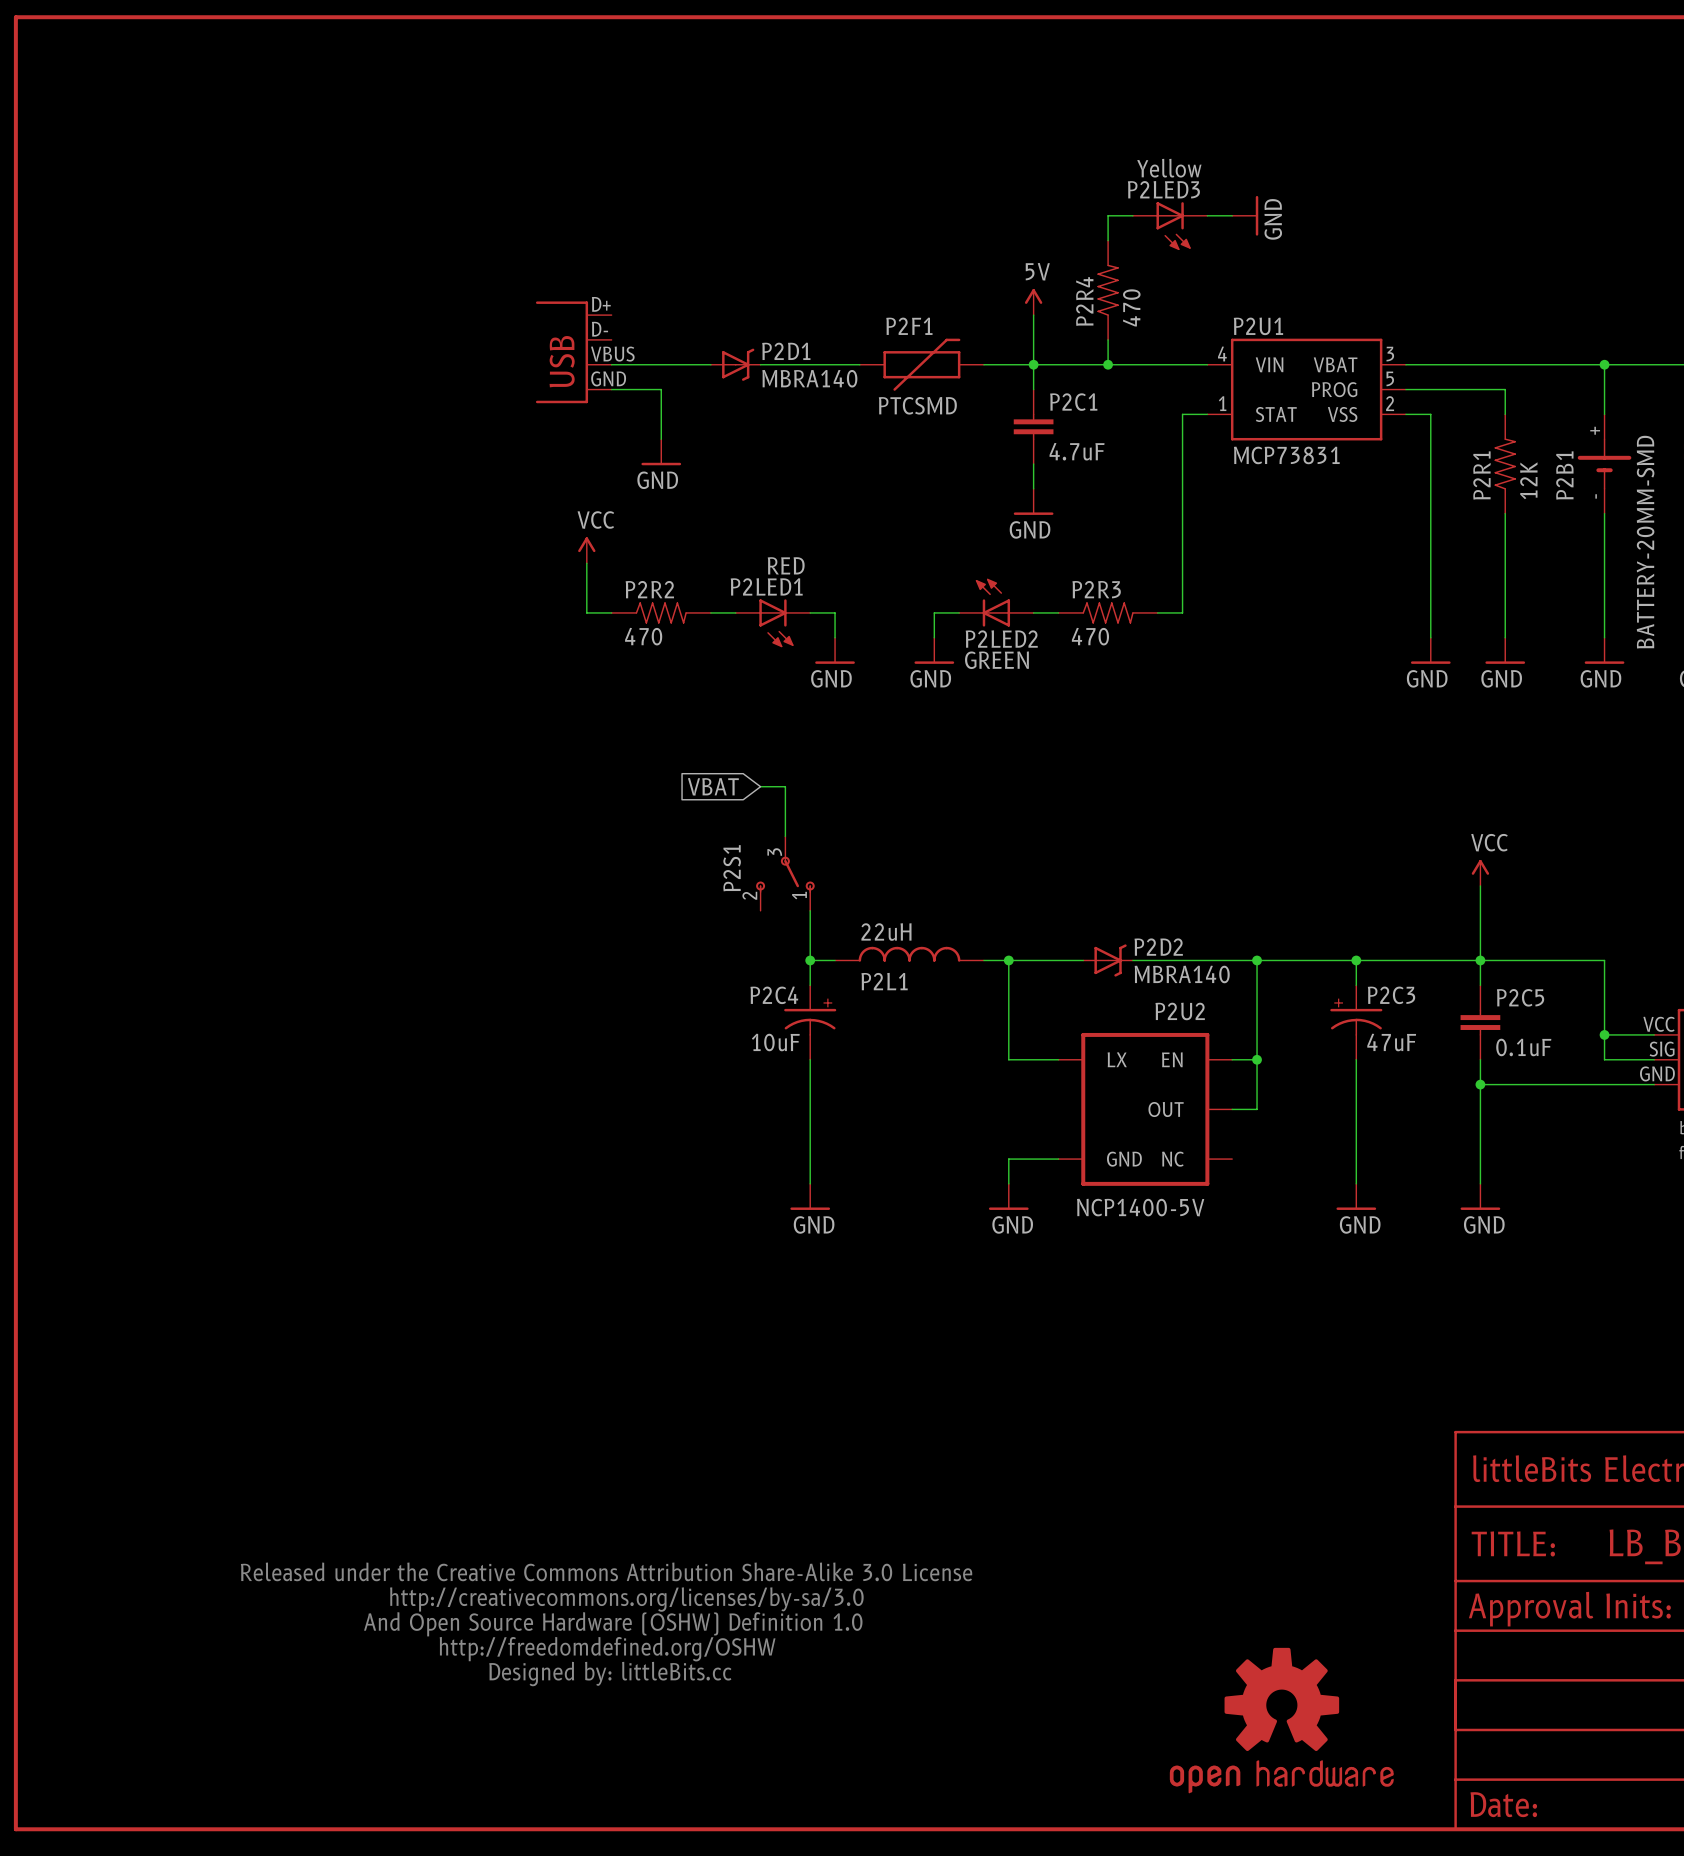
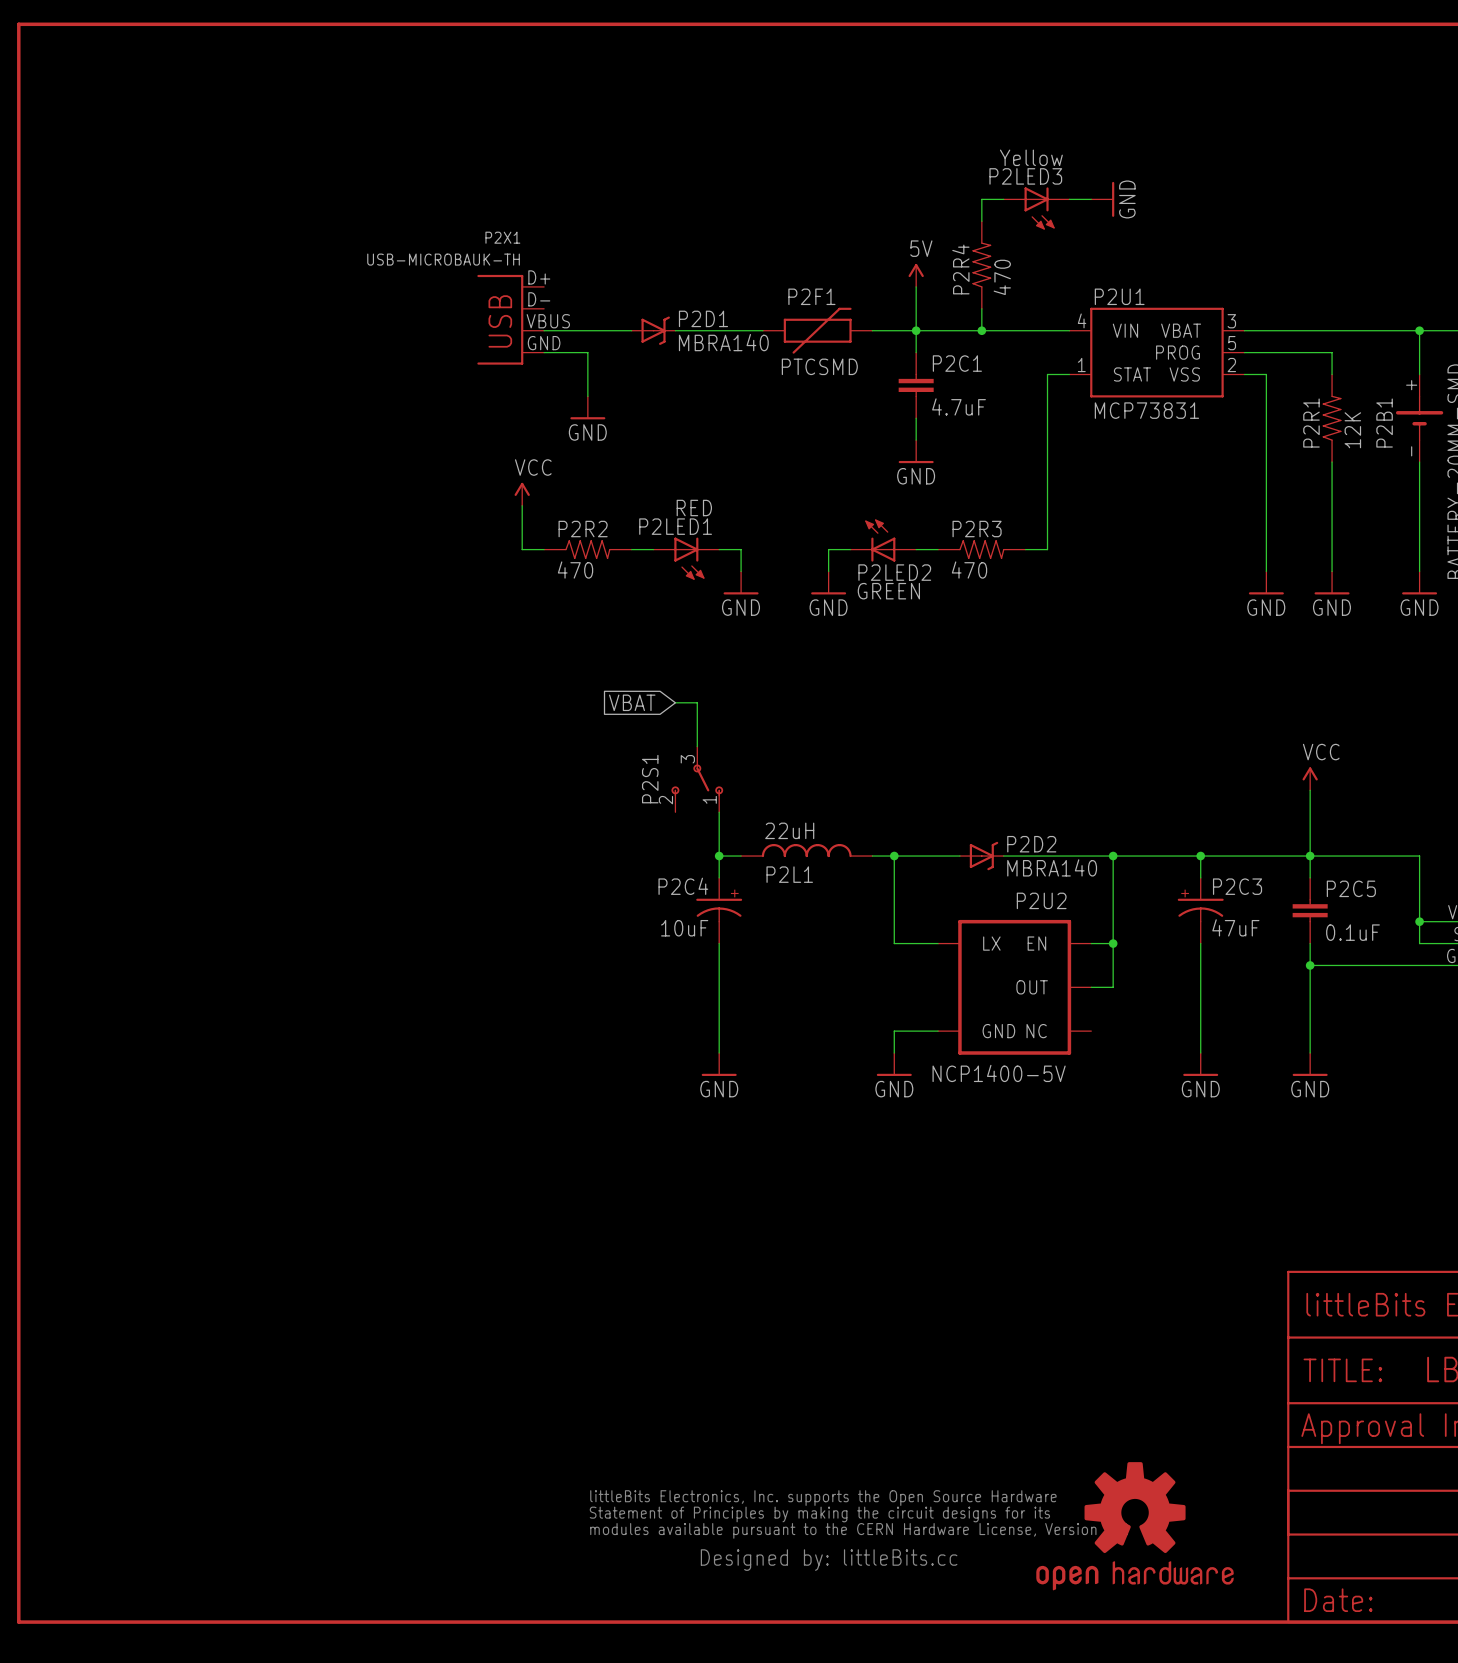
P2X1 name: none -> P2X1 (502, 237)
P2X1 value: none -> USB-MICROBAUK-TH (443, 259)
part: (606, 1624) -> none
part: none -> (858, 1530)

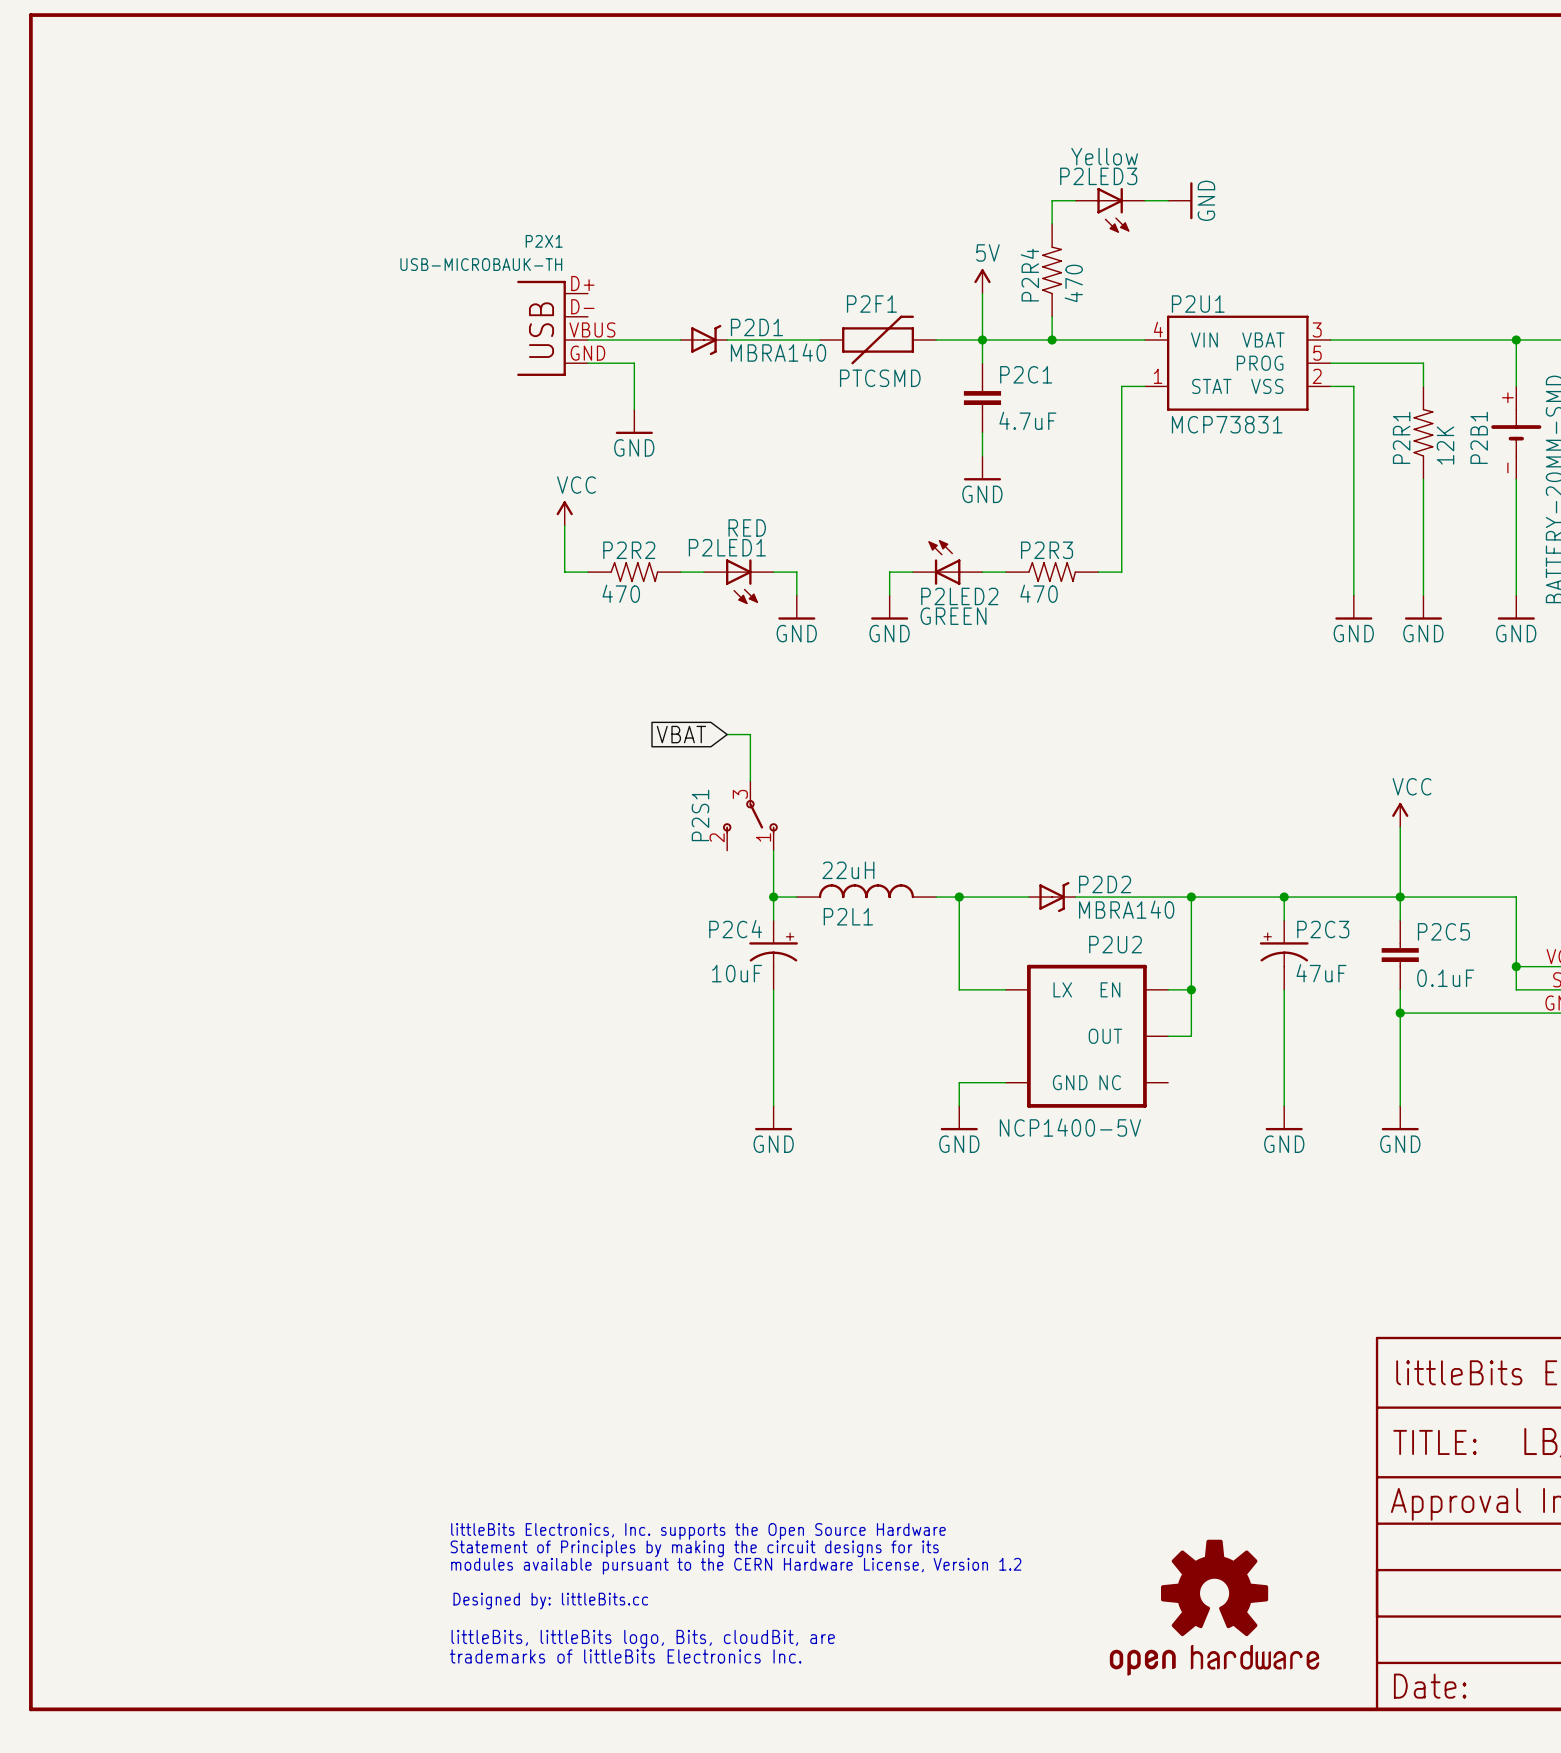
part: none -> (735, 1593)
part: (858, 1530) -> none

